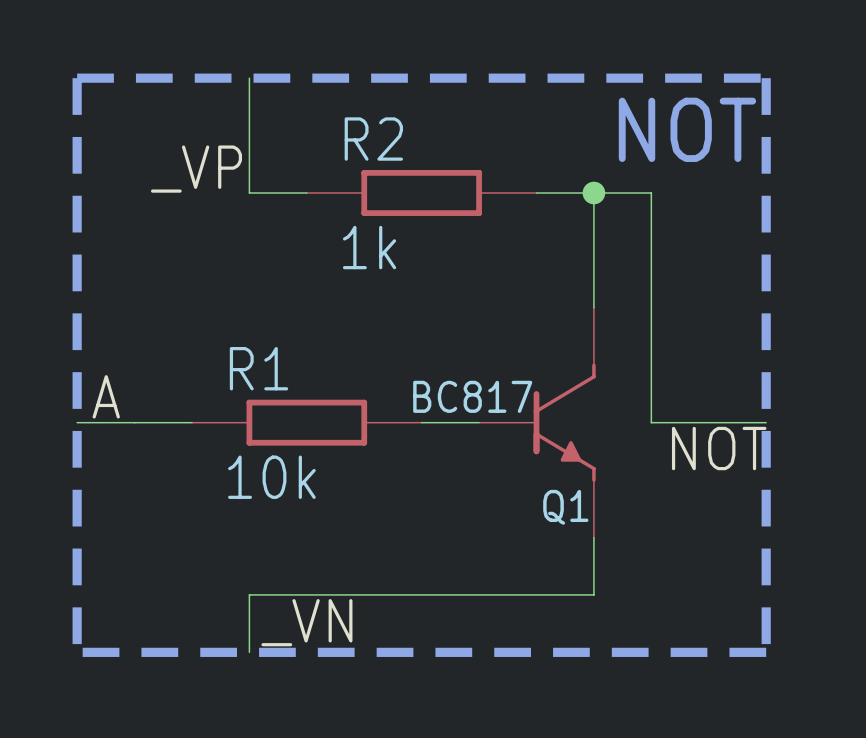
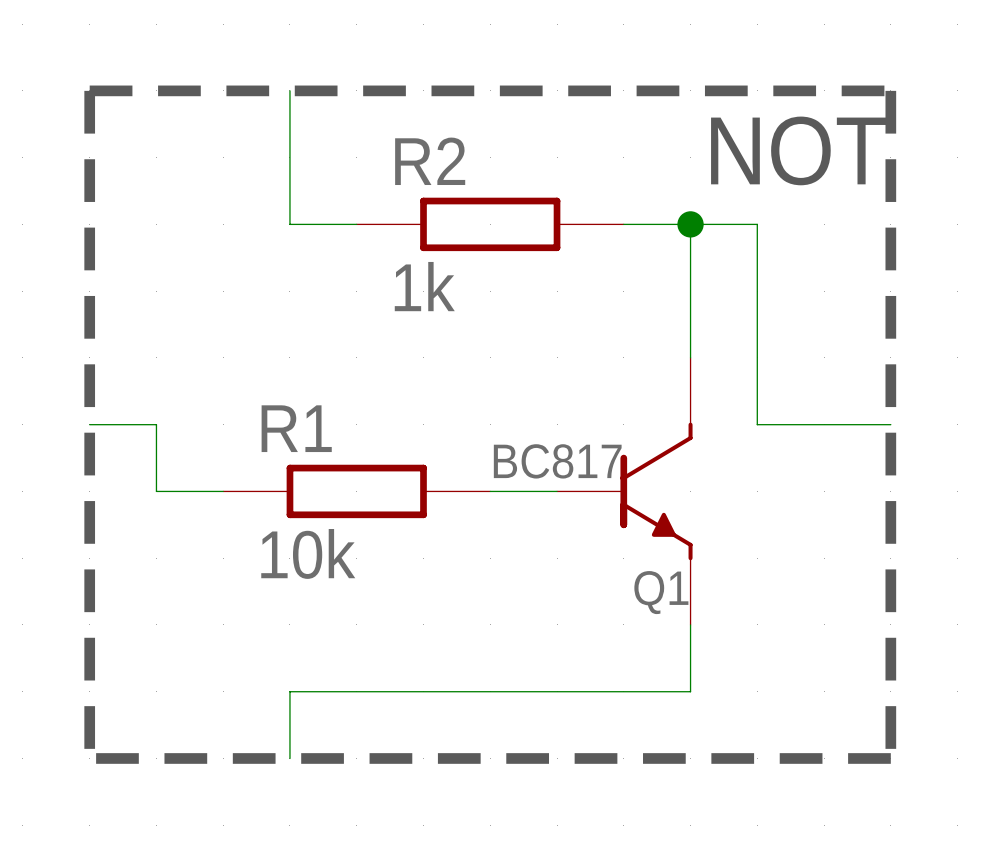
label: _VP (196, 169) -> none
wire: (651, 365) (651, 422) (766, 422) -> (757, 424) (890, 424)
label: A (106, 396) -> none
wire: (77, 422) (134, 422) -> (89, 424) (156, 424) (156, 491)
label: NOT (719, 448) -> none
label: _VN (306, 622) -> none

